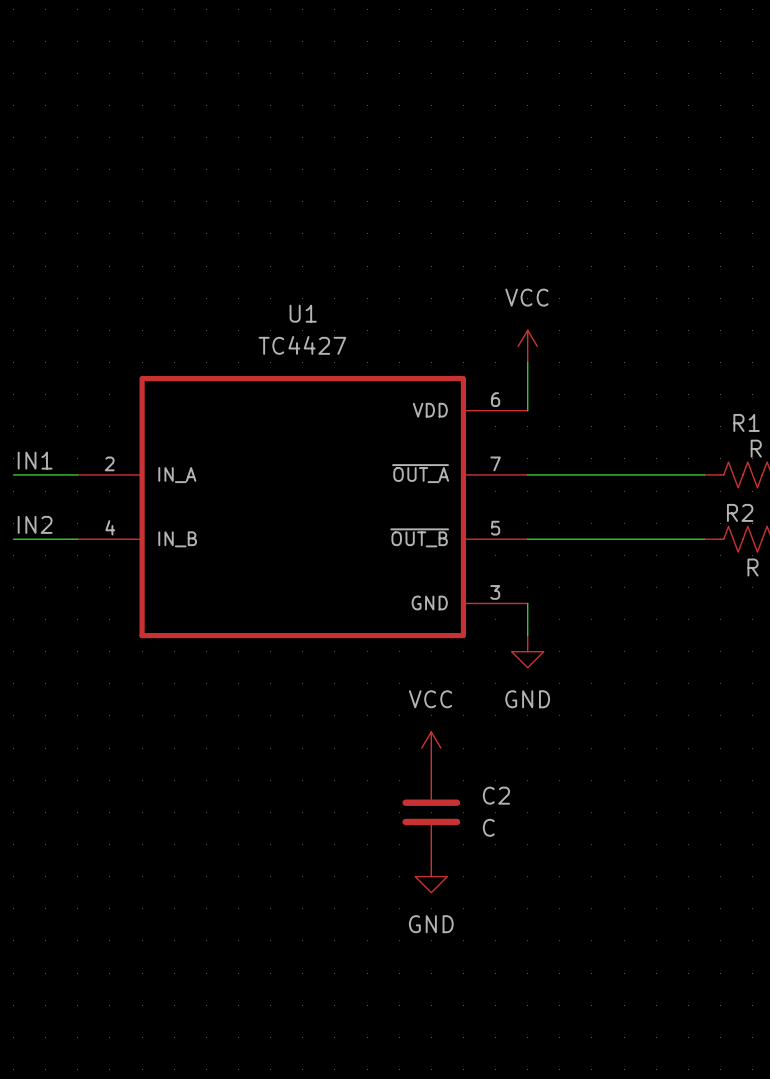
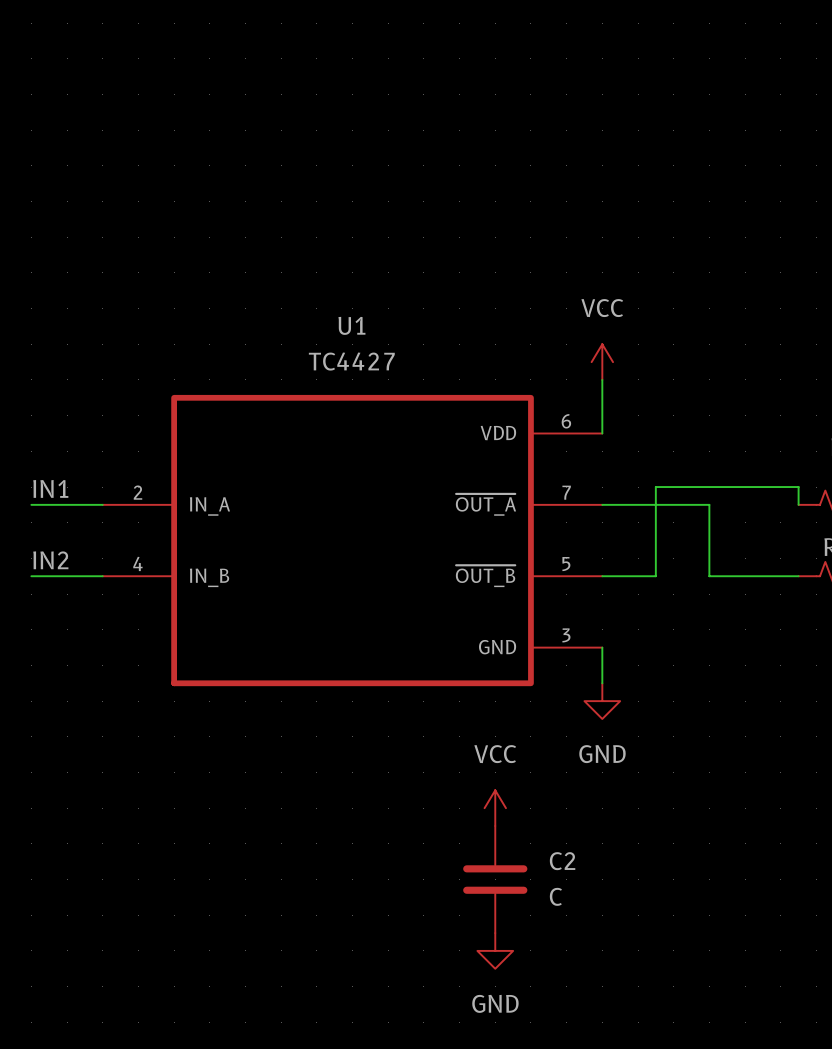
wire: (624, 474) (704, 474) -> (655, 576) (655, 487) (798, 487) (798, 504)
wire: (575, 539) (624, 539) -> (709, 504) (709, 576)

